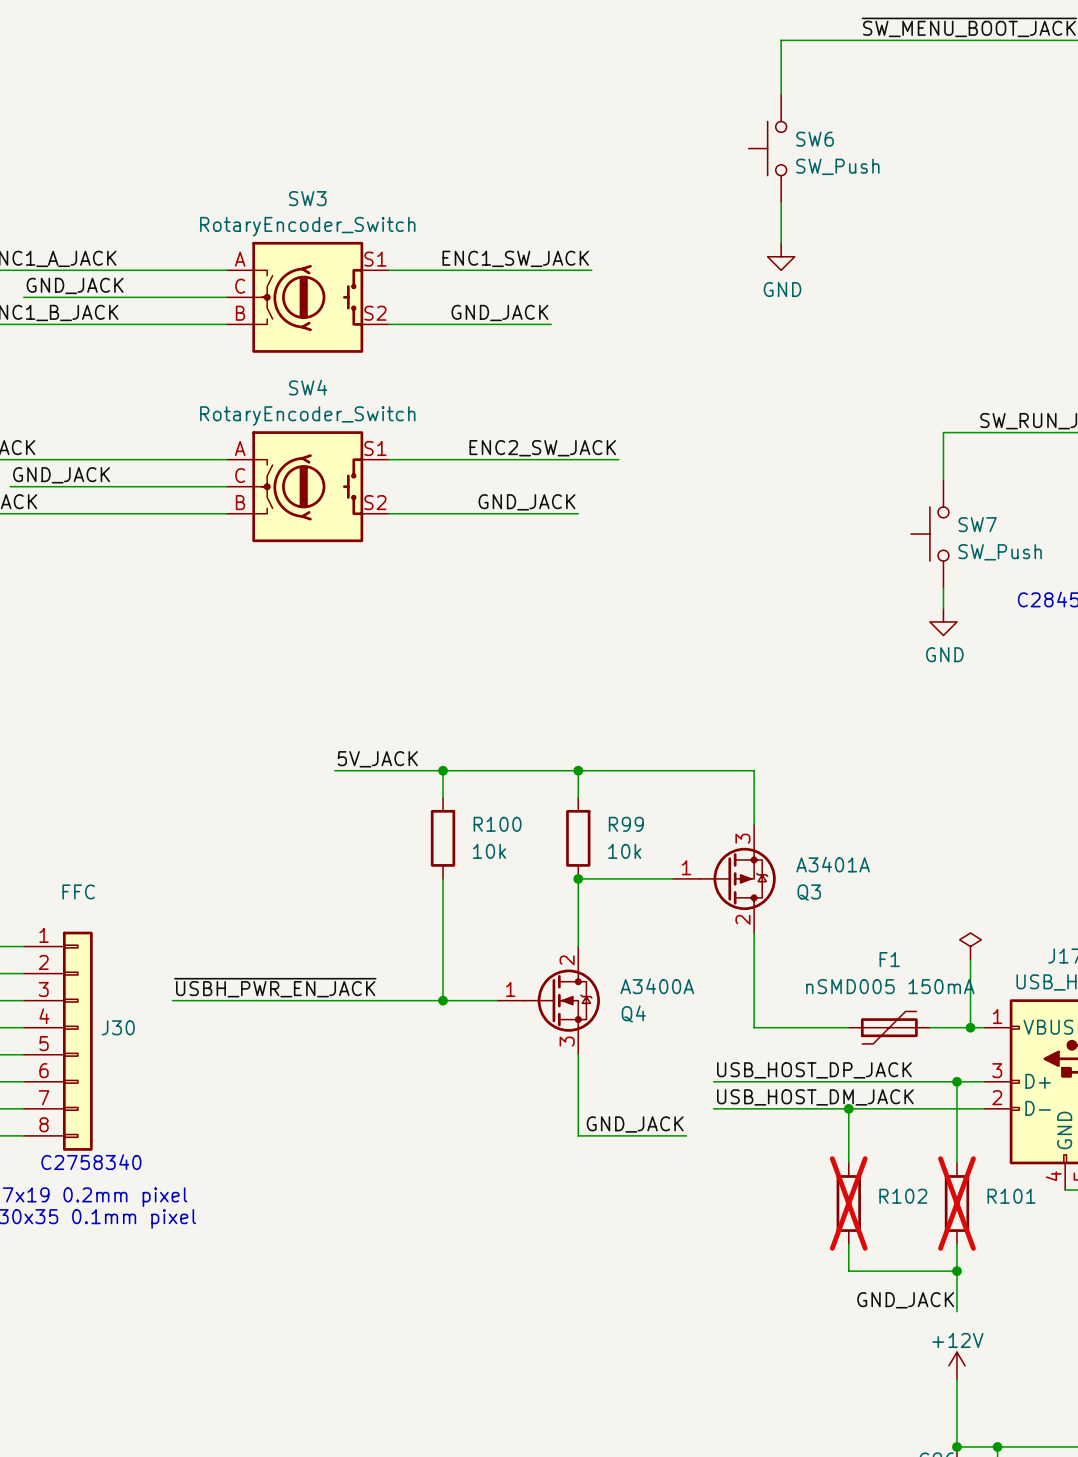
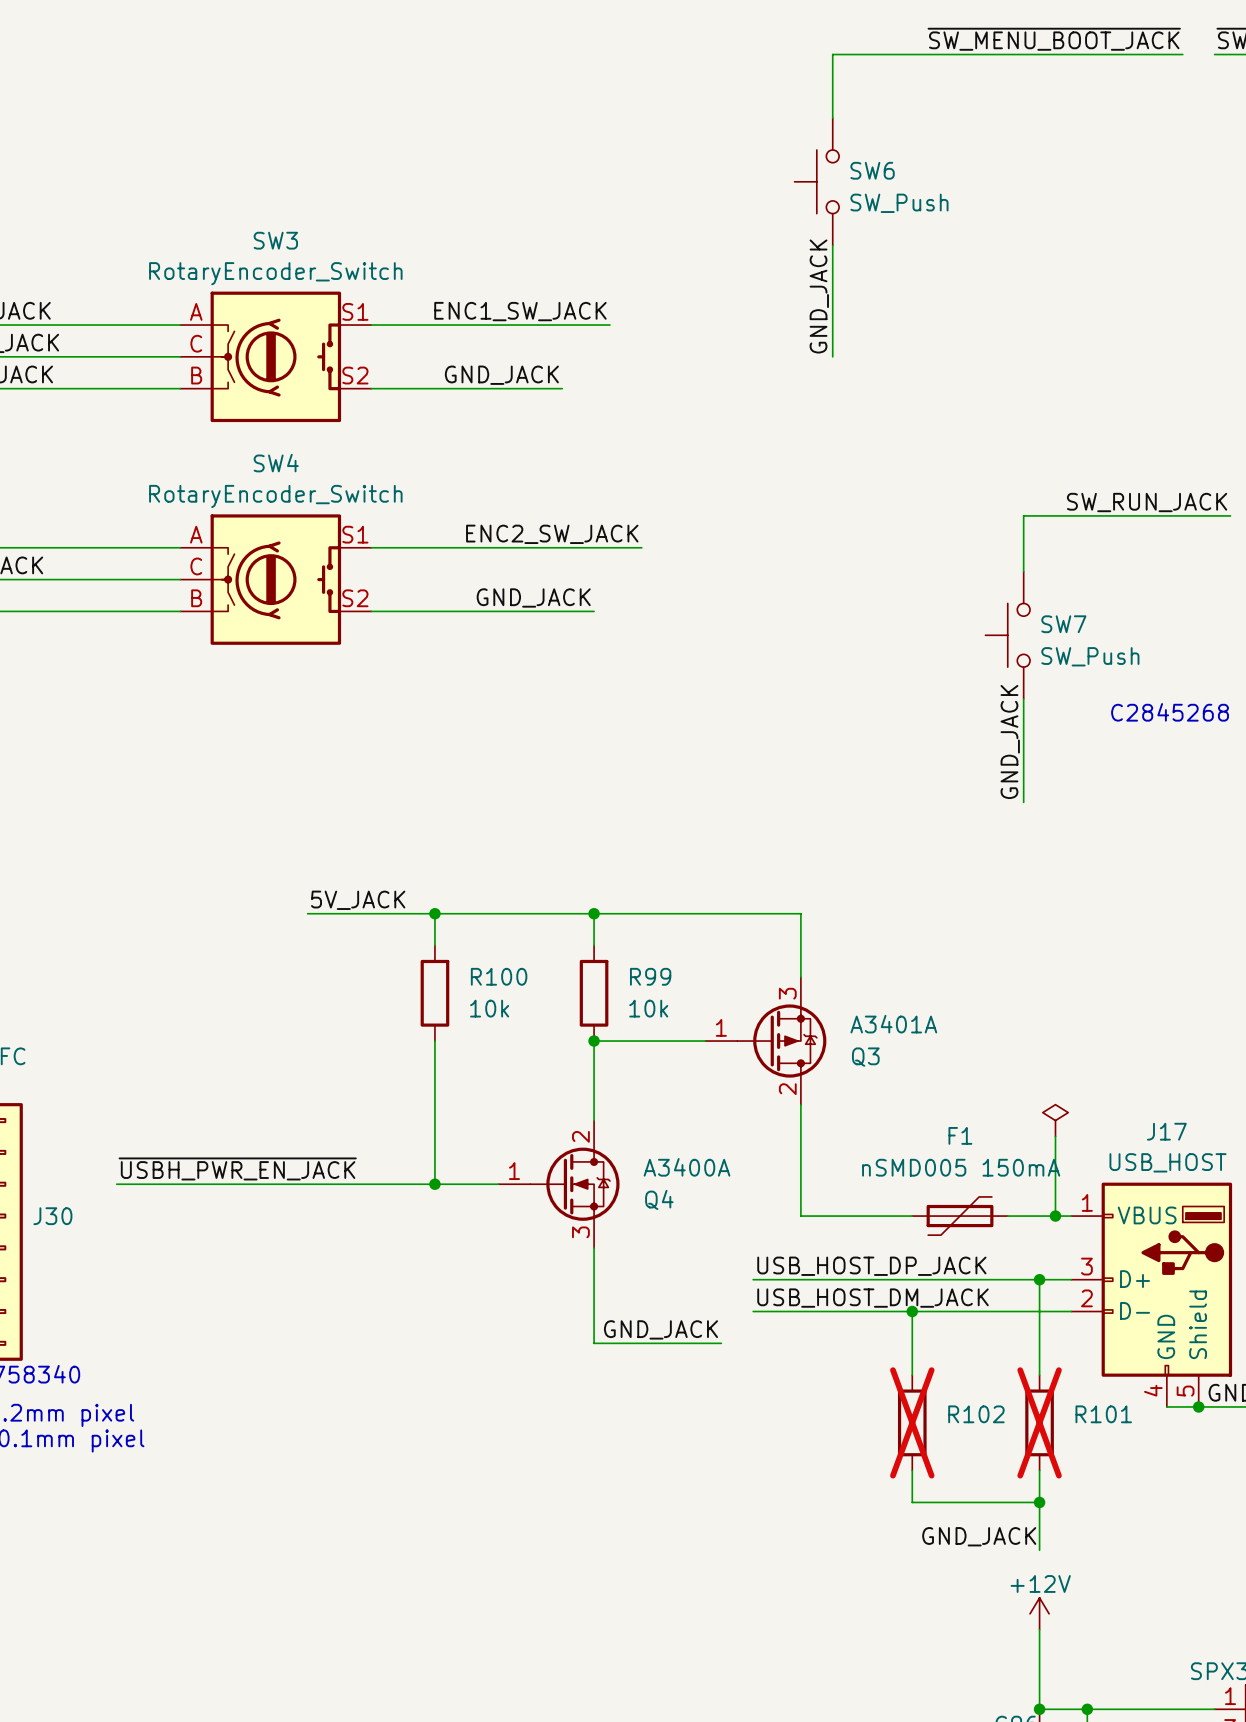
wire: none -> (832, 293) (832, 356)
label: none -> GND_JACK (819, 296)
power symbol: GND (781, 256) -> none
wire: none -> (1023, 722) (1023, 802)
power symbol: GND (943, 621) -> none
label: none -> GND_JACK (1010, 742)

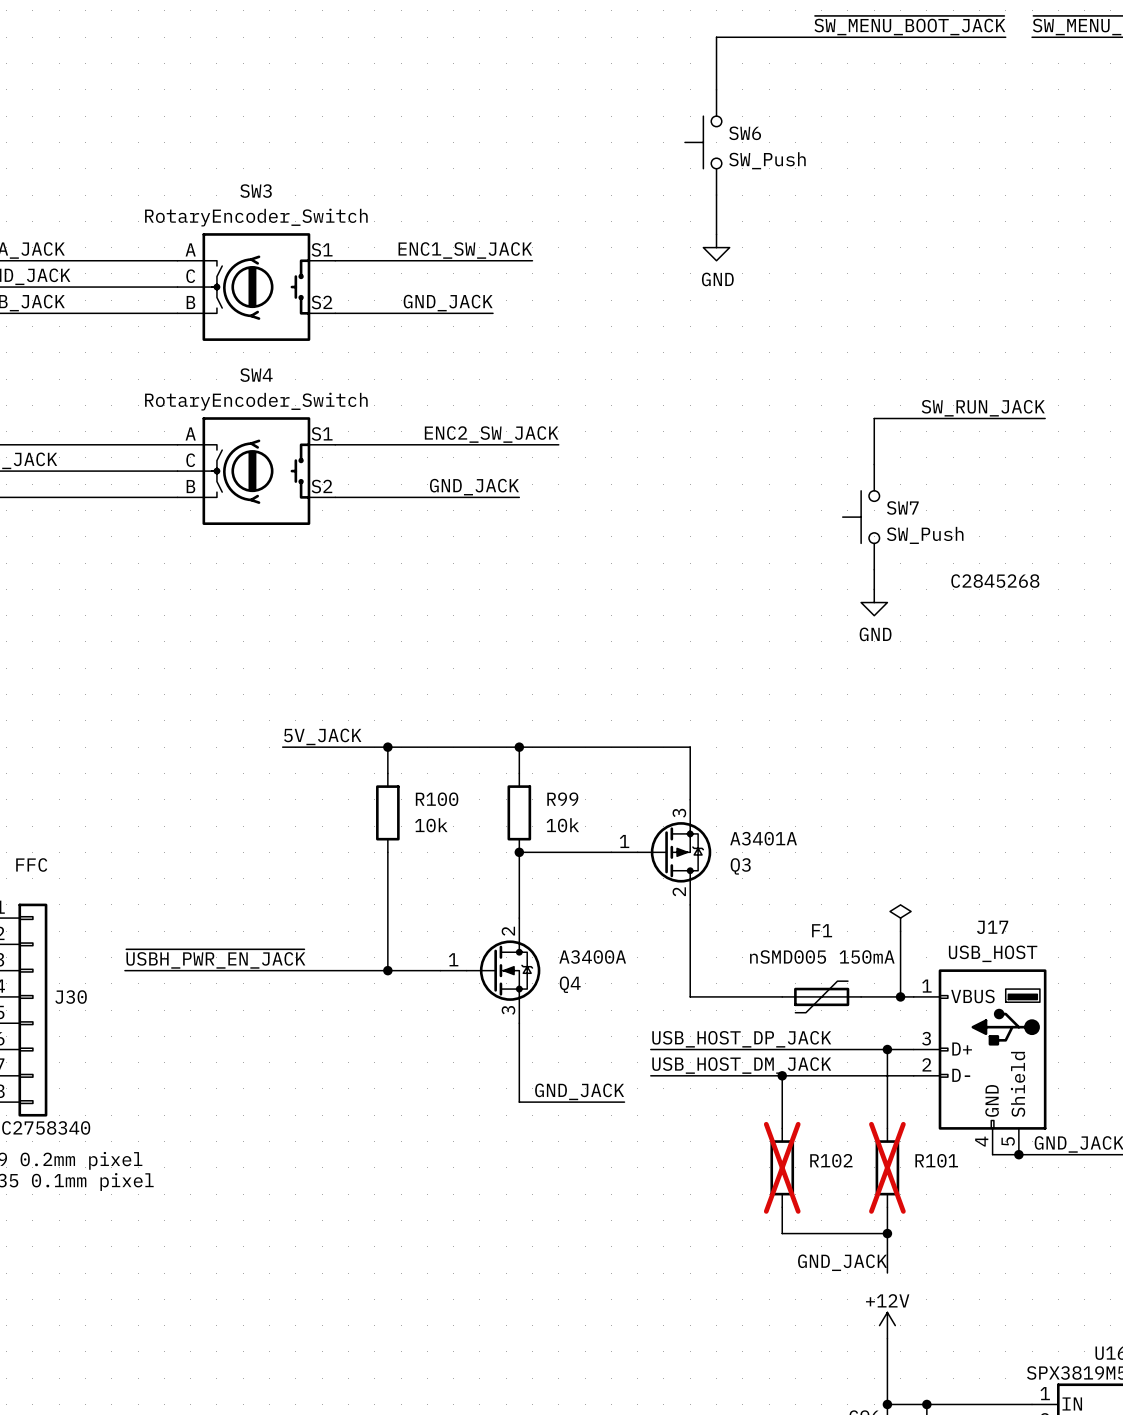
wire: (832, 293) (832, 356) -> none
label: GND_JACK (819, 296) -> none
power symbol: none -> GND (716, 247)
wire: (1023, 722) (1023, 802) -> none
power symbol: none -> GND (874, 602)
label: GND_JACK (1010, 742) -> none

